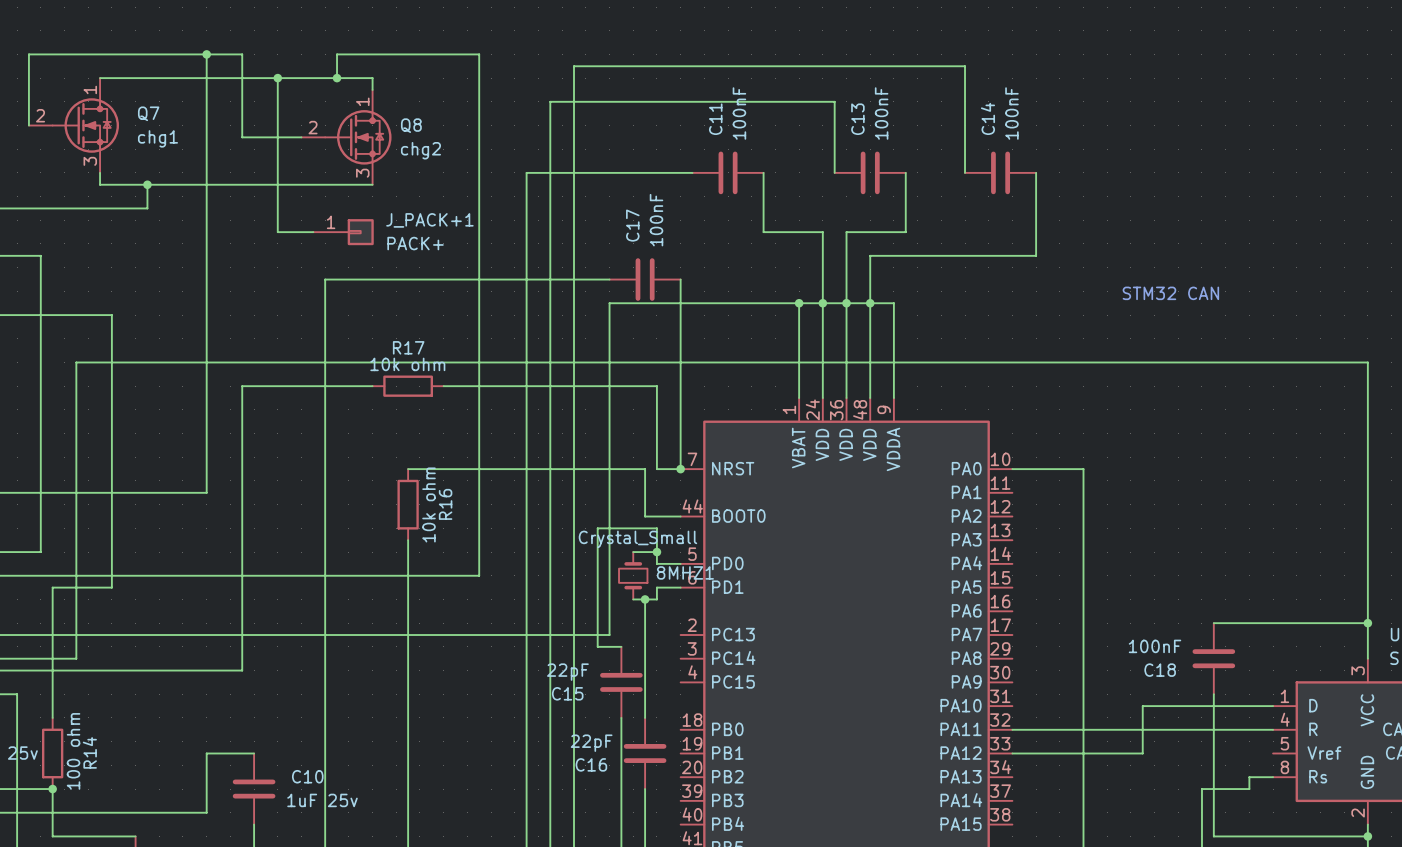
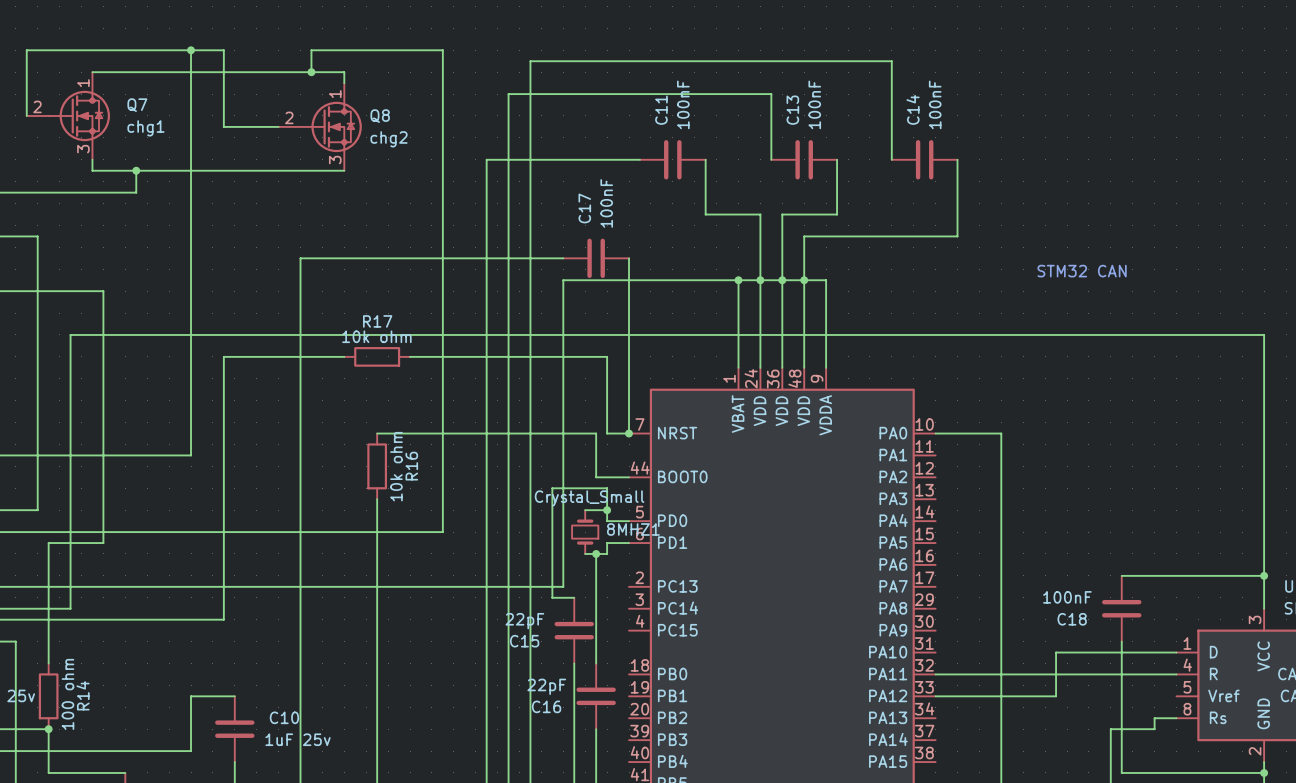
wire: (277, 78) (277, 232) (313, 232) -> none
junction: (277, 78) -> none
J_PACK+1: PACK+ (343, 232) -> none

